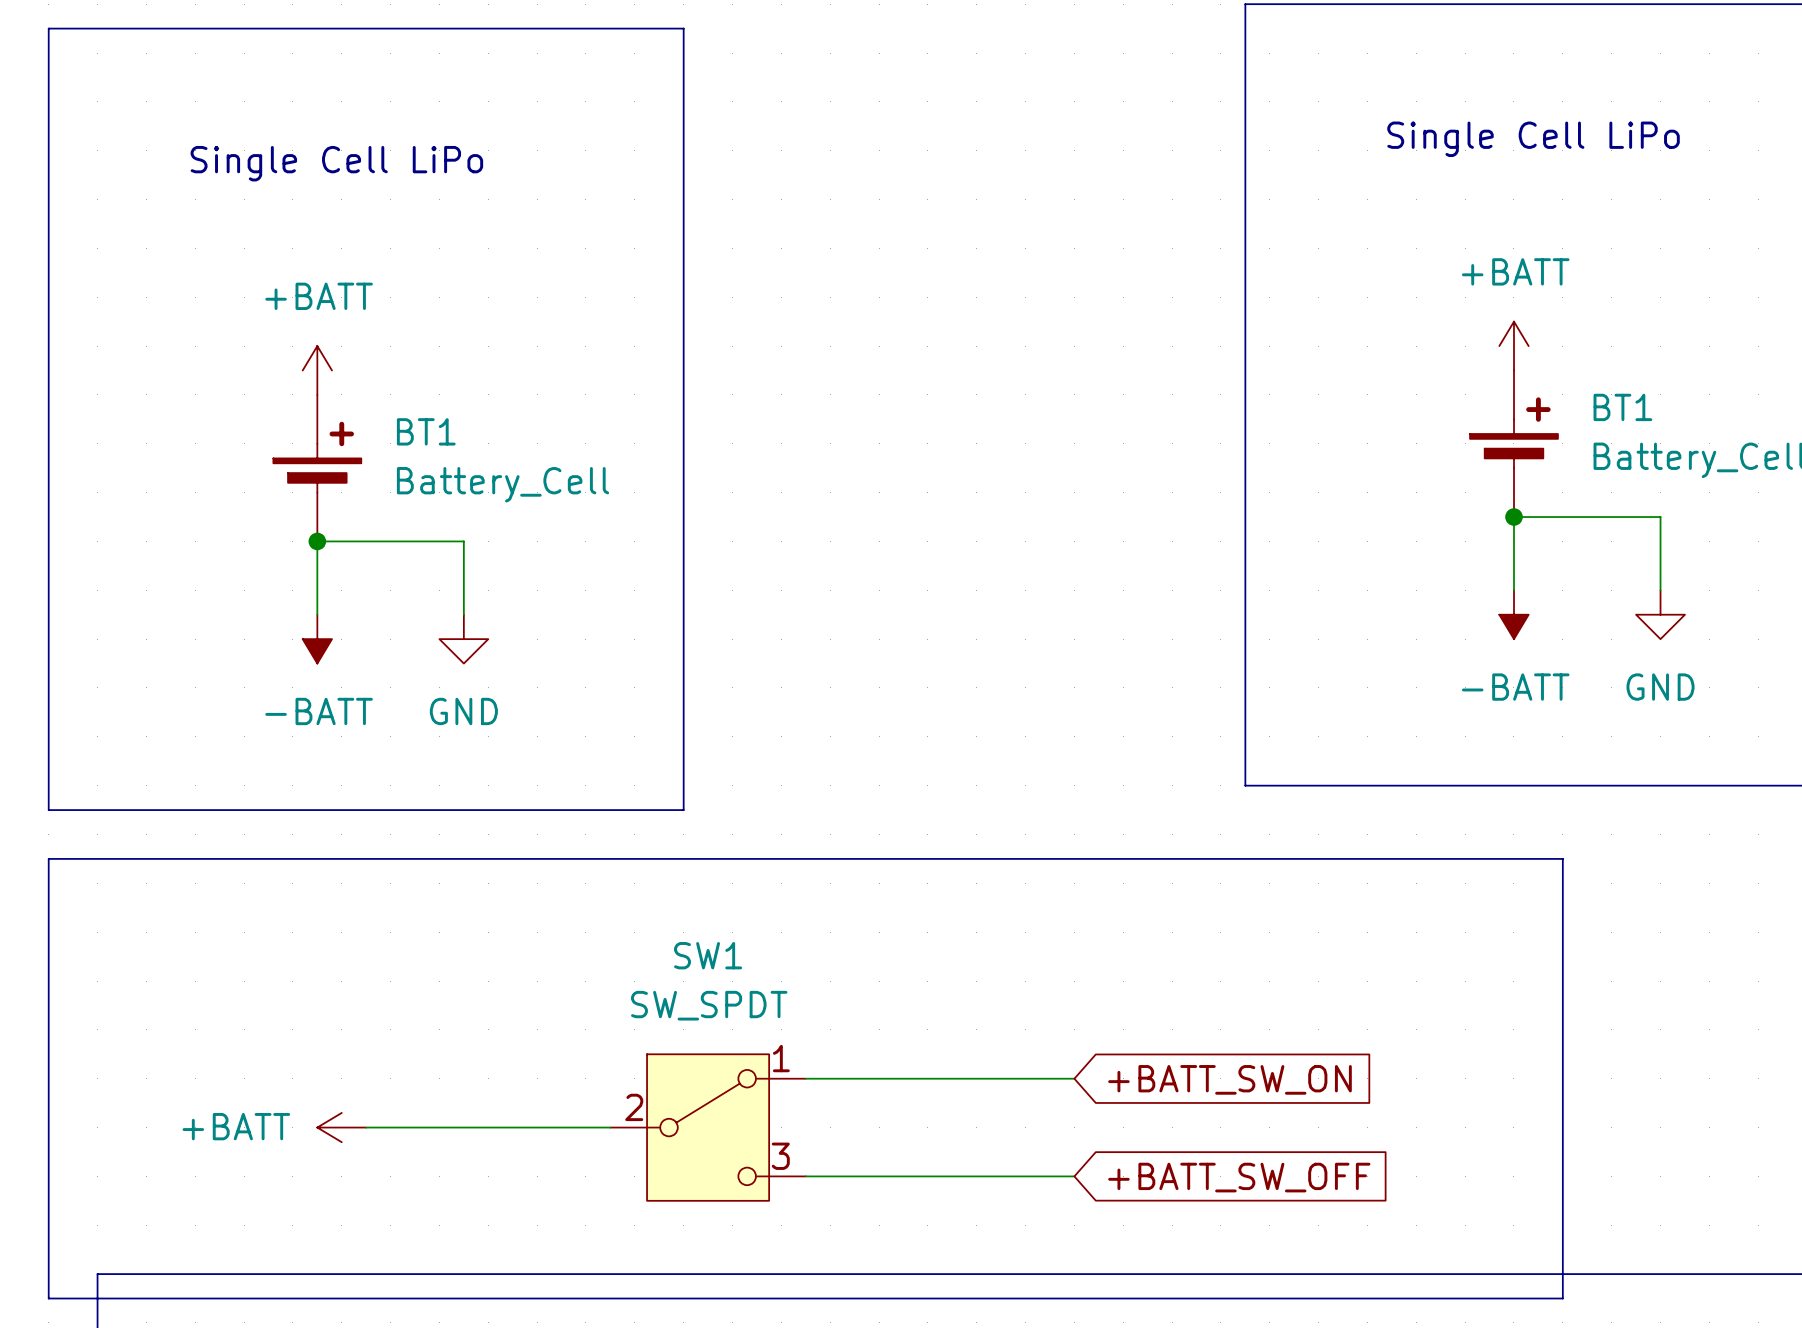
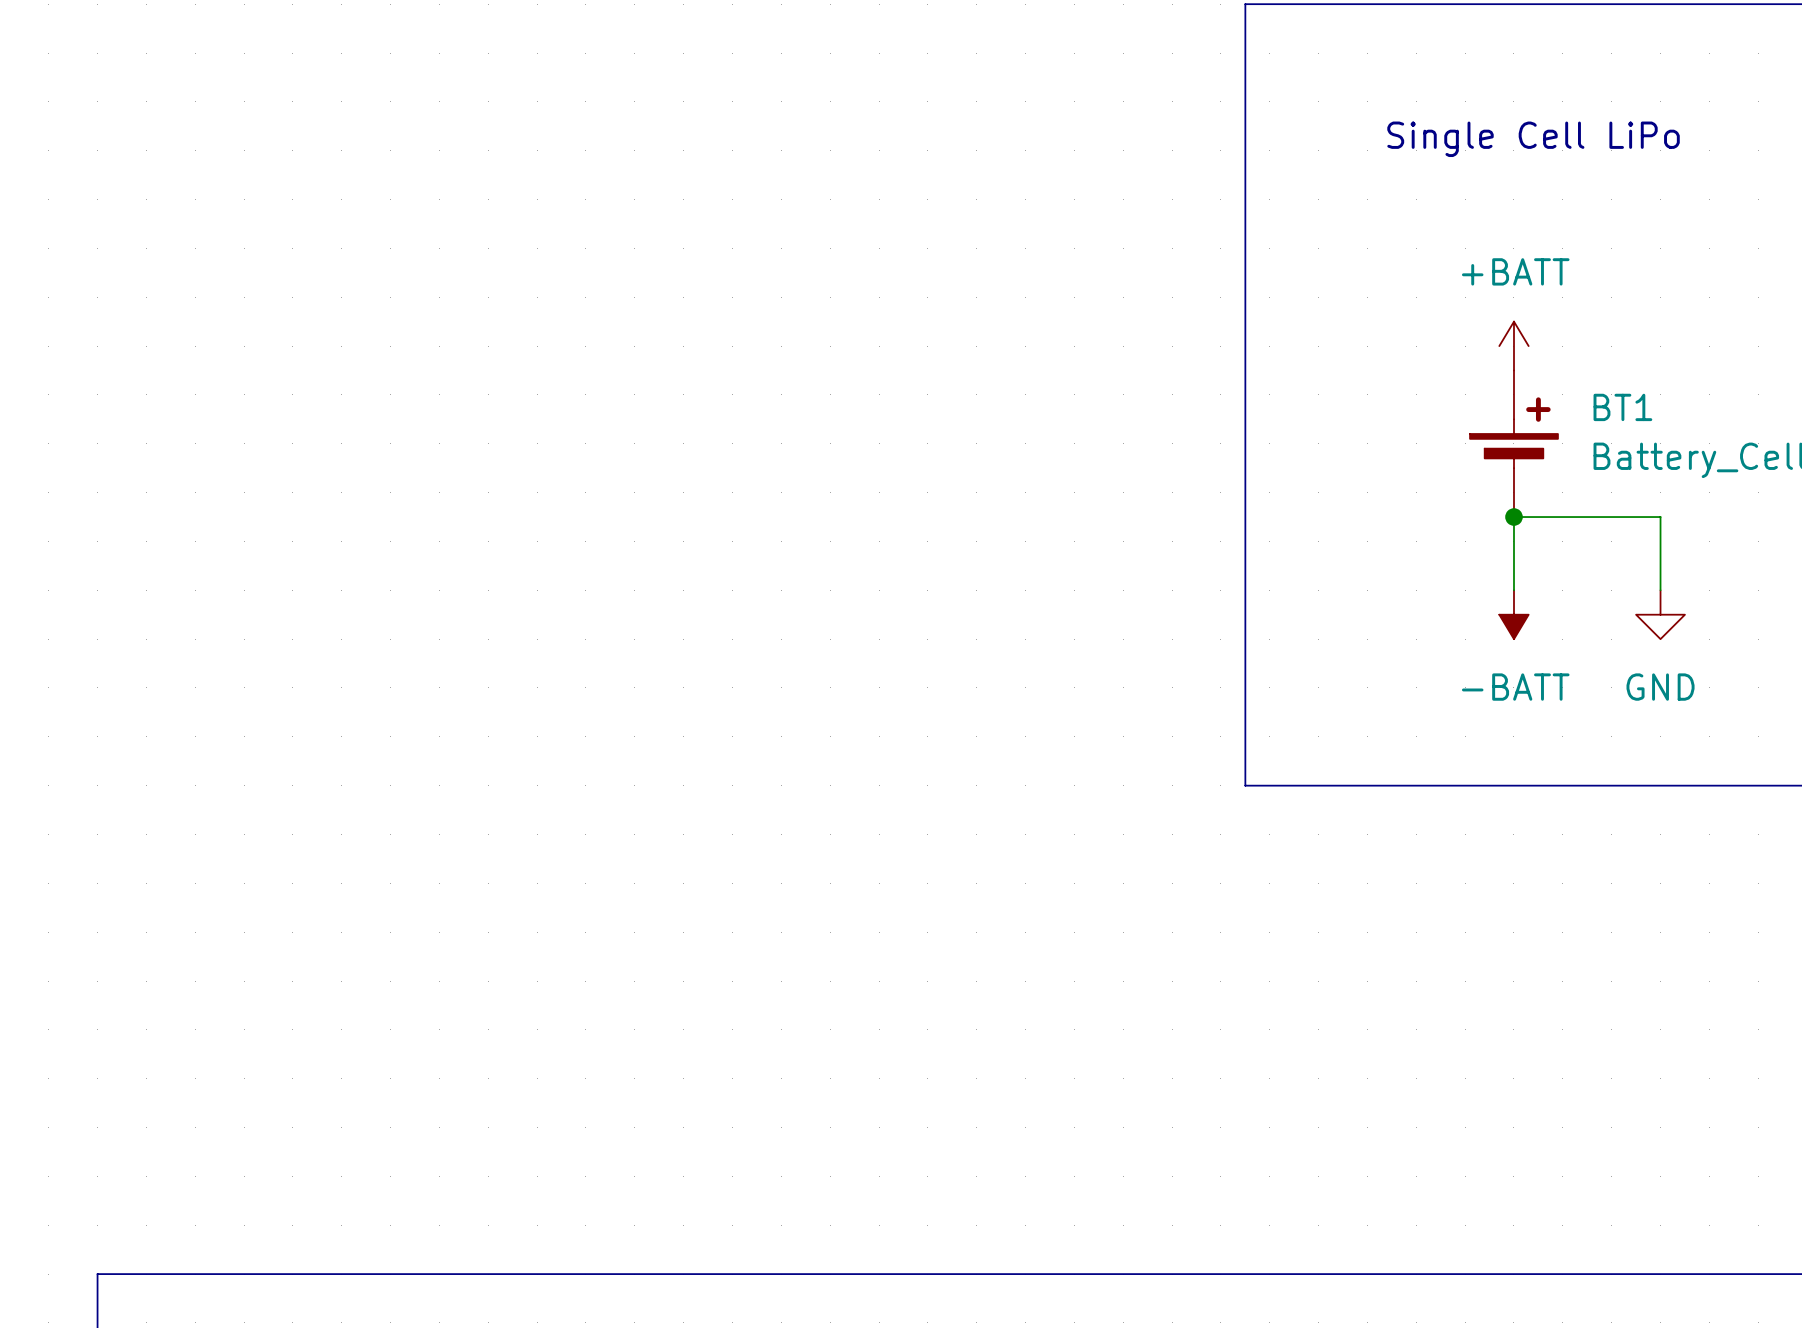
line: (48, 28) (683, 28) (683, 810) (48, 810) (48, 28) -> none
text: Single Cell LiPo (336, 163) -> none
power symbol: +BATT (317, 370) -> none
BT1: Battery_Cell (317, 468) -> none
junction: (317, 541) -> none
wire: (317, 614) (317, 541) (463, 541) (463, 614) -> none
power symbol: -BATT (317, 639) -> none
power symbol: GND (463, 639) -> none
line: (48, 858) (48, 1298) (1562, 1298) (1562, 858) (48, 858) -> none
wire: (805, 1078) (1074, 1078) -> none
global label: +BATT_SW_ON (1229, 1079) -> none
power symbol: +BATT (341, 1127) -> none
wire: (366, 1127) (610, 1127) -> none
SW1: SW_SPDT (708, 1127) -> none
wire: (805, 1176) (1074, 1176) -> none
global label: +BATT_SW_OFF (1239, 1177) -> none

